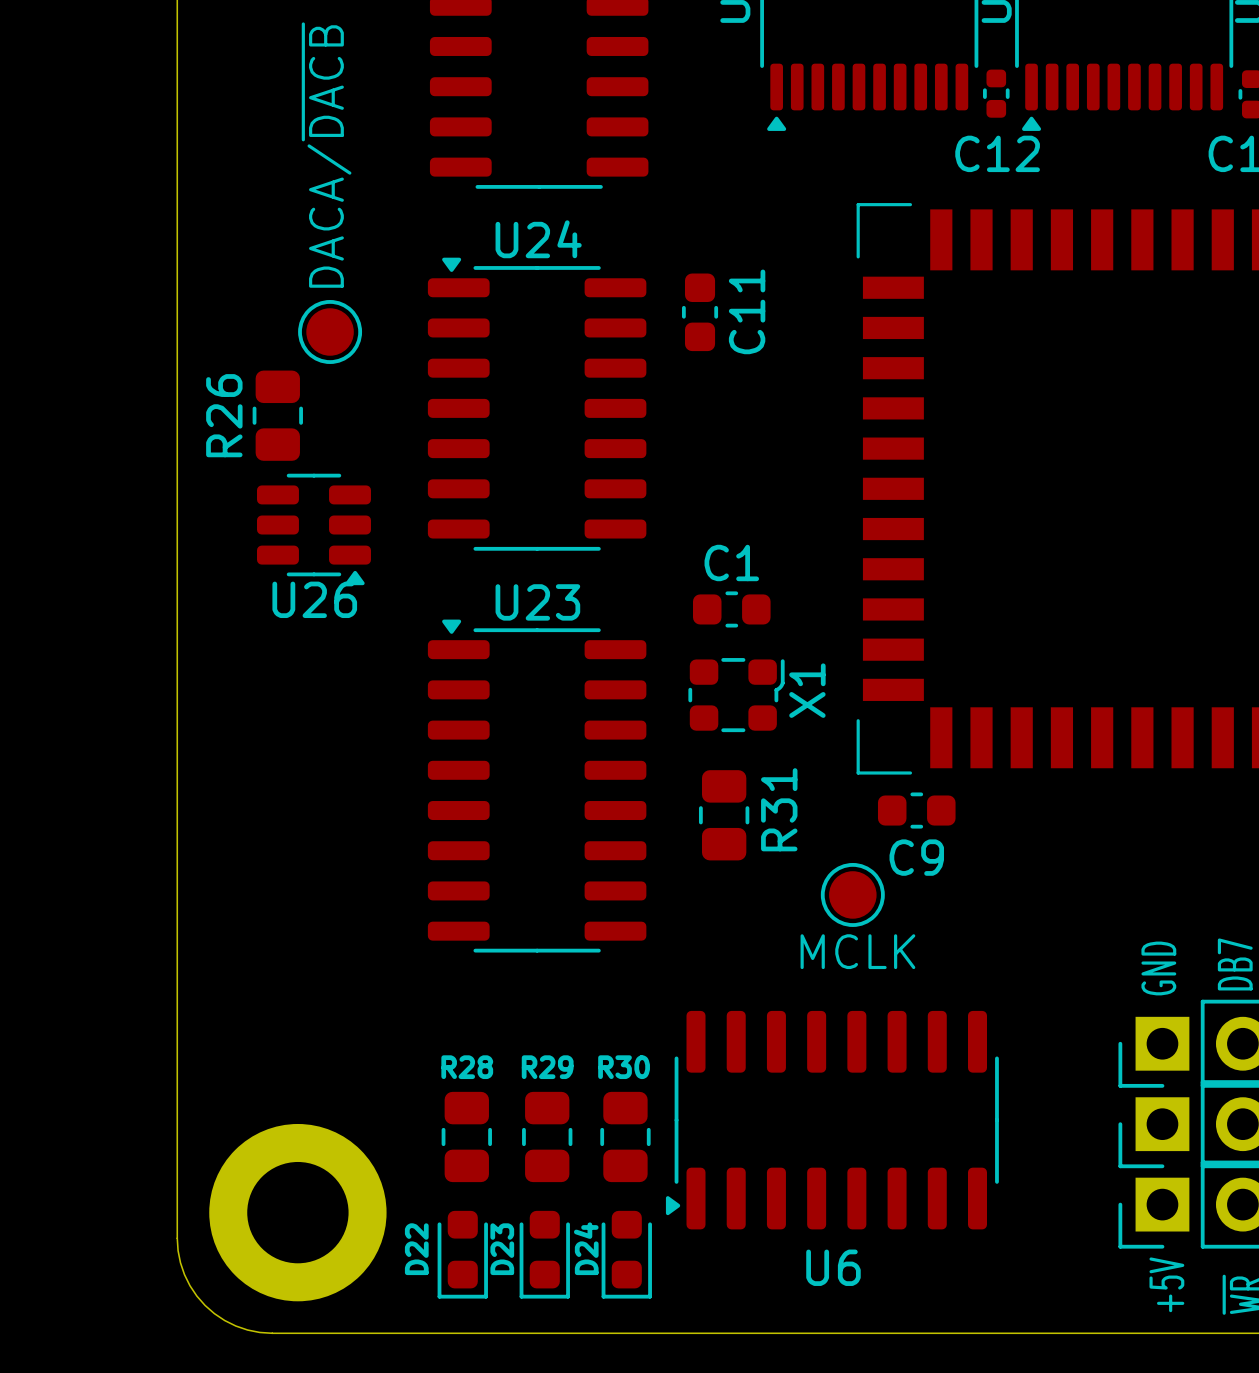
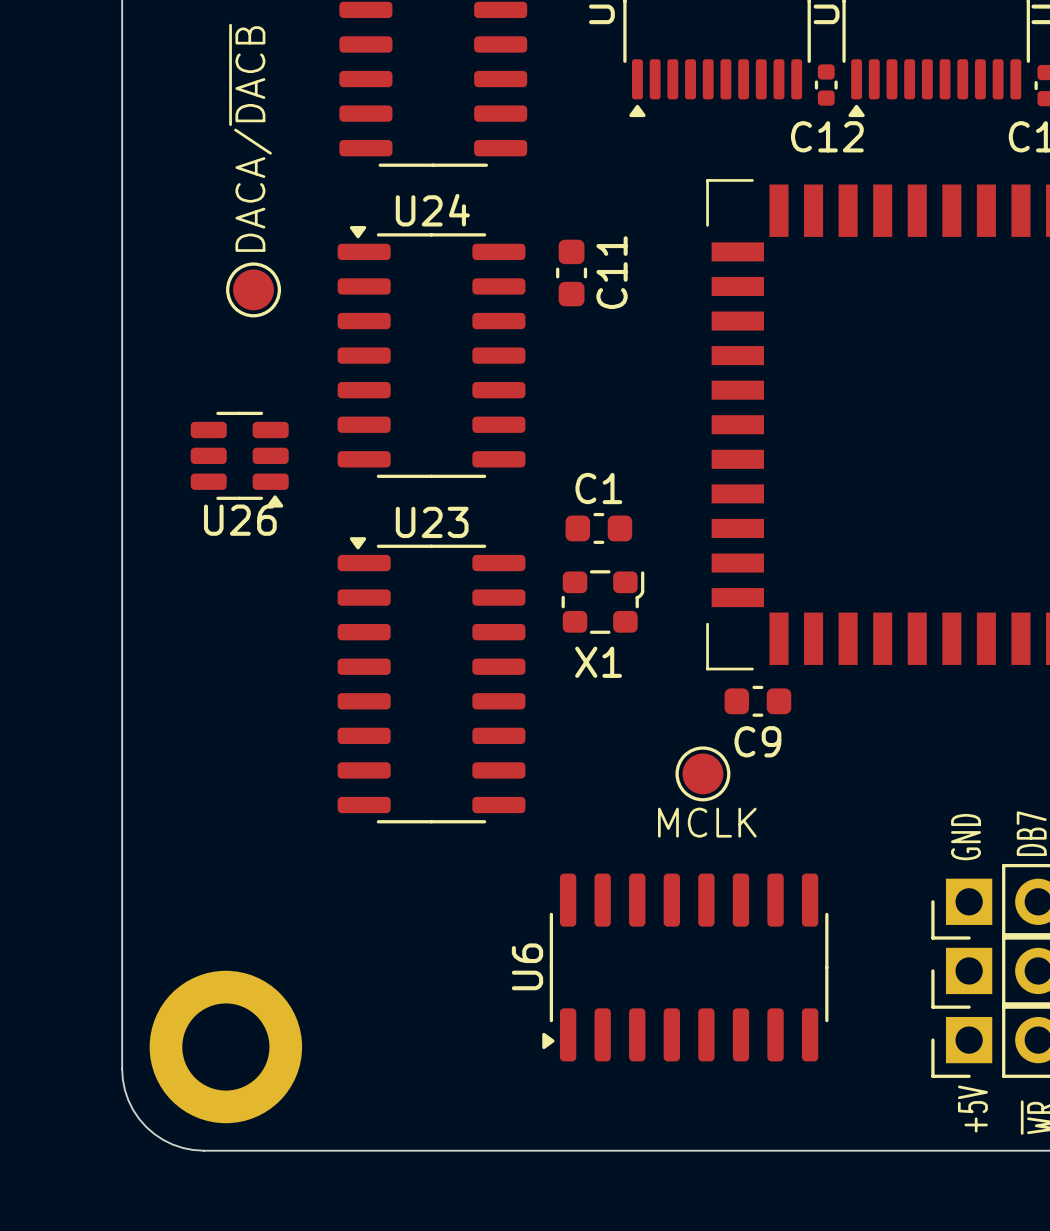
R26: (277, 415) -> none
X1 name rotation: 0° (807, 690) -> 90° clockwise (598, 662)
X1 name position: X1 (807, 690) -> X1 (598, 662)
R31: (724, 815) -> none
R28: (466, 1136) -> none
R29: (547, 1136) -> none
R30: (625, 1136) -> none
D22: (462, 1254) -> none
D23: (544, 1254) -> none
D24: (626, 1254) -> none
U6 name rotation: 0° (833, 1267) -> 90° counterclockwise (527, 966)
U6 name position: U6 (833, 1267) -> U6 (527, 966)

